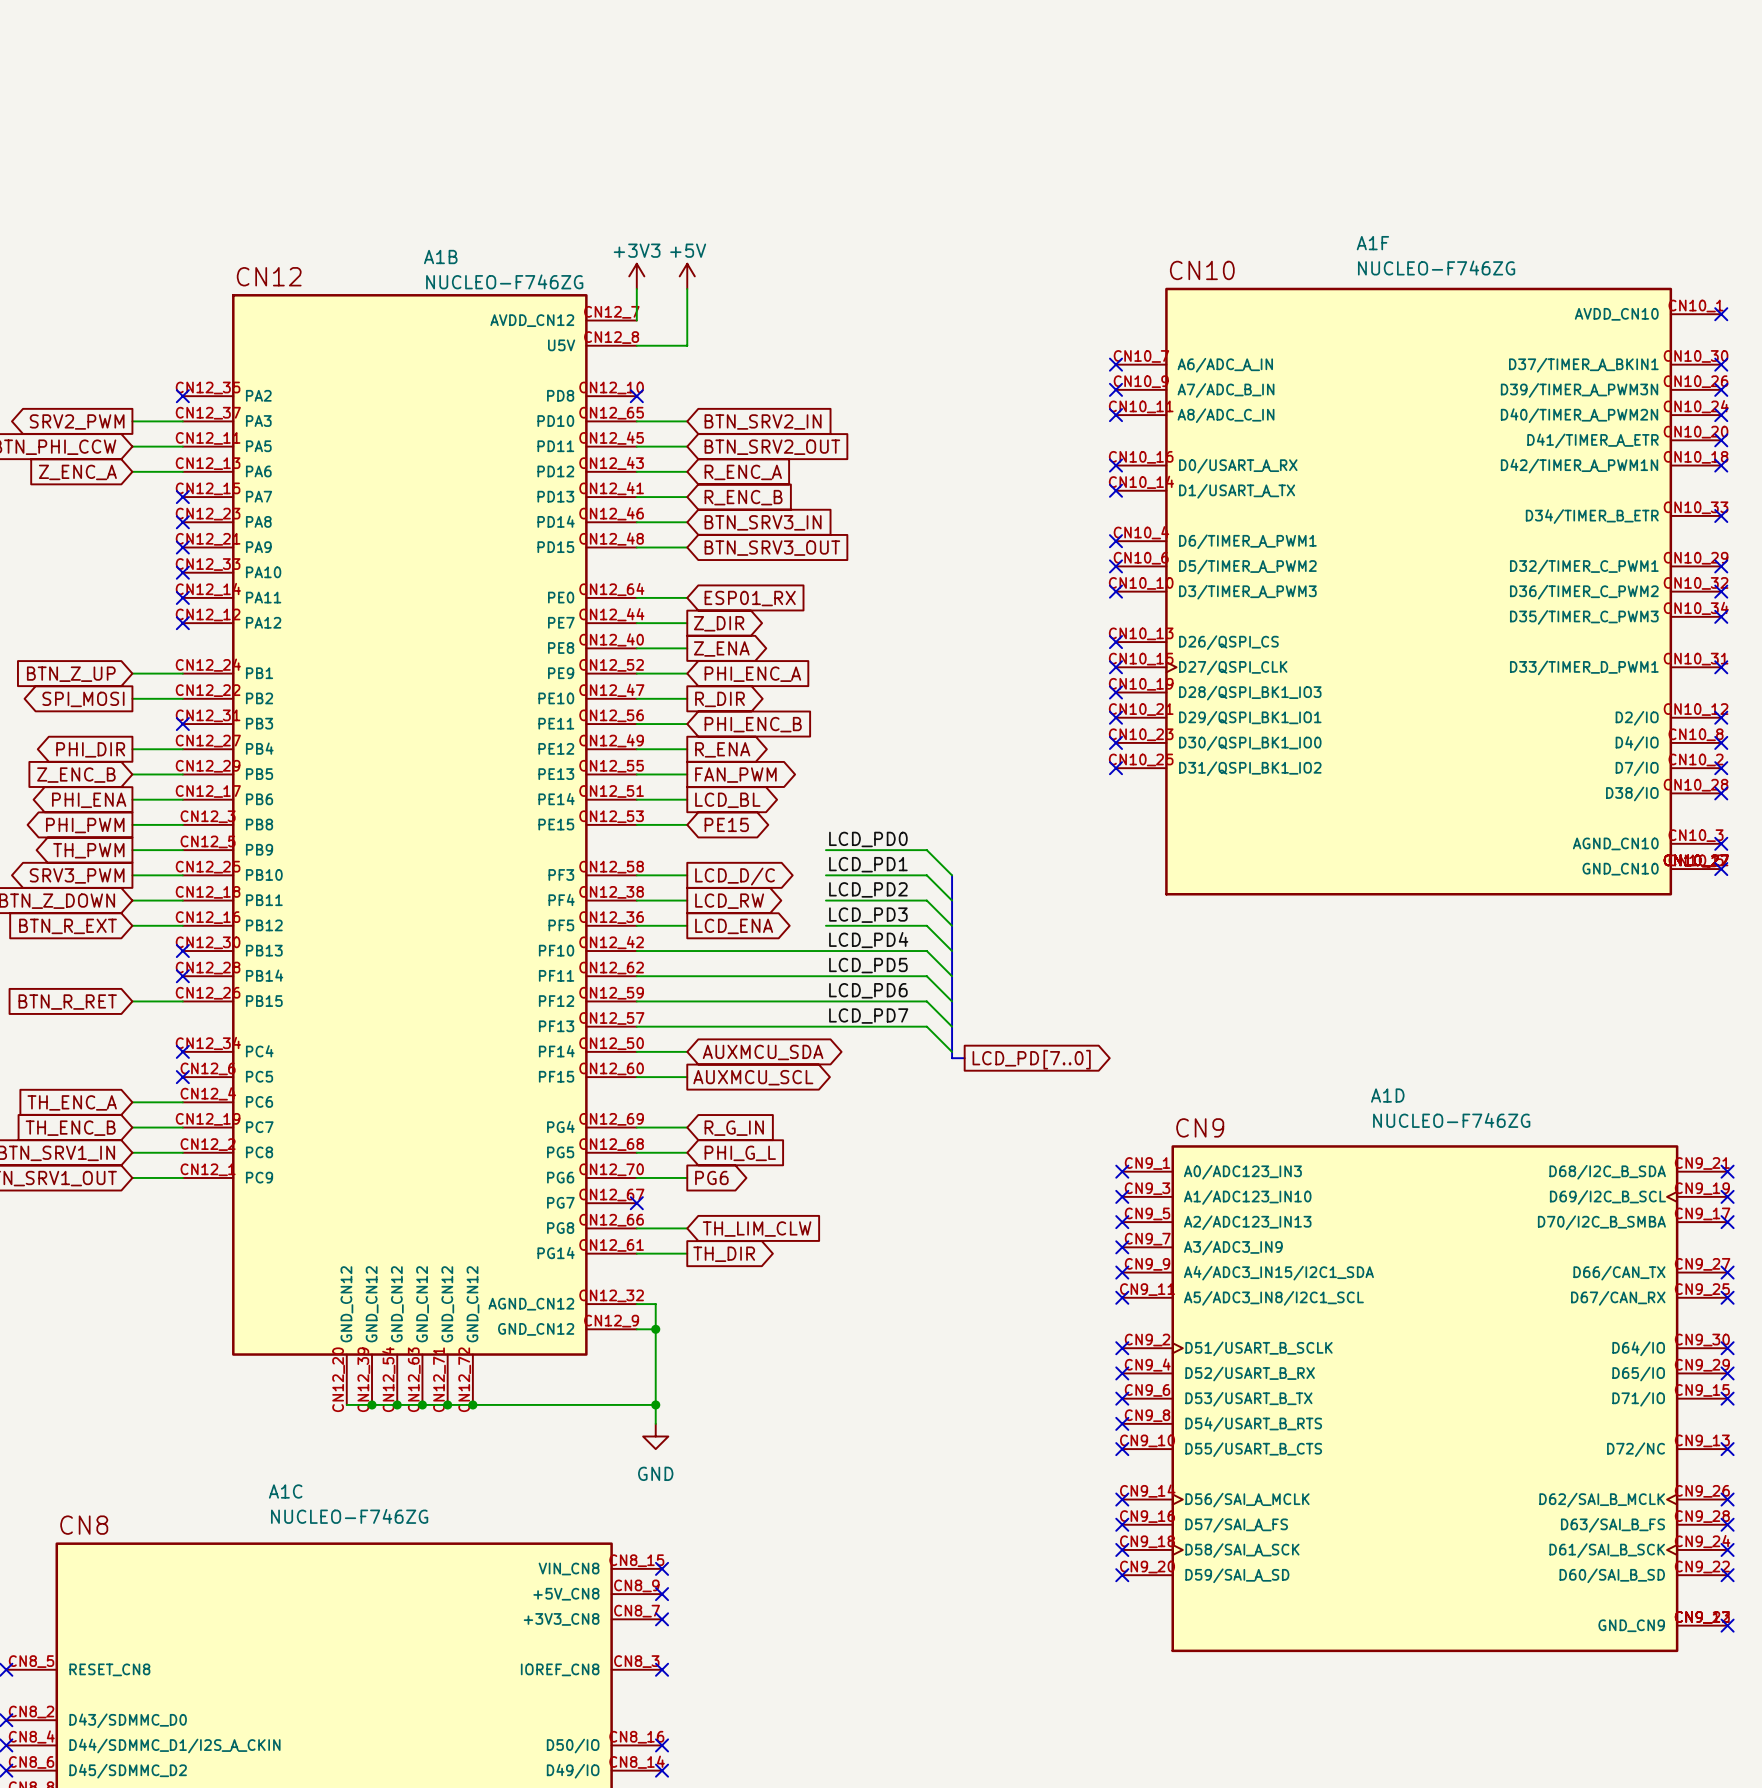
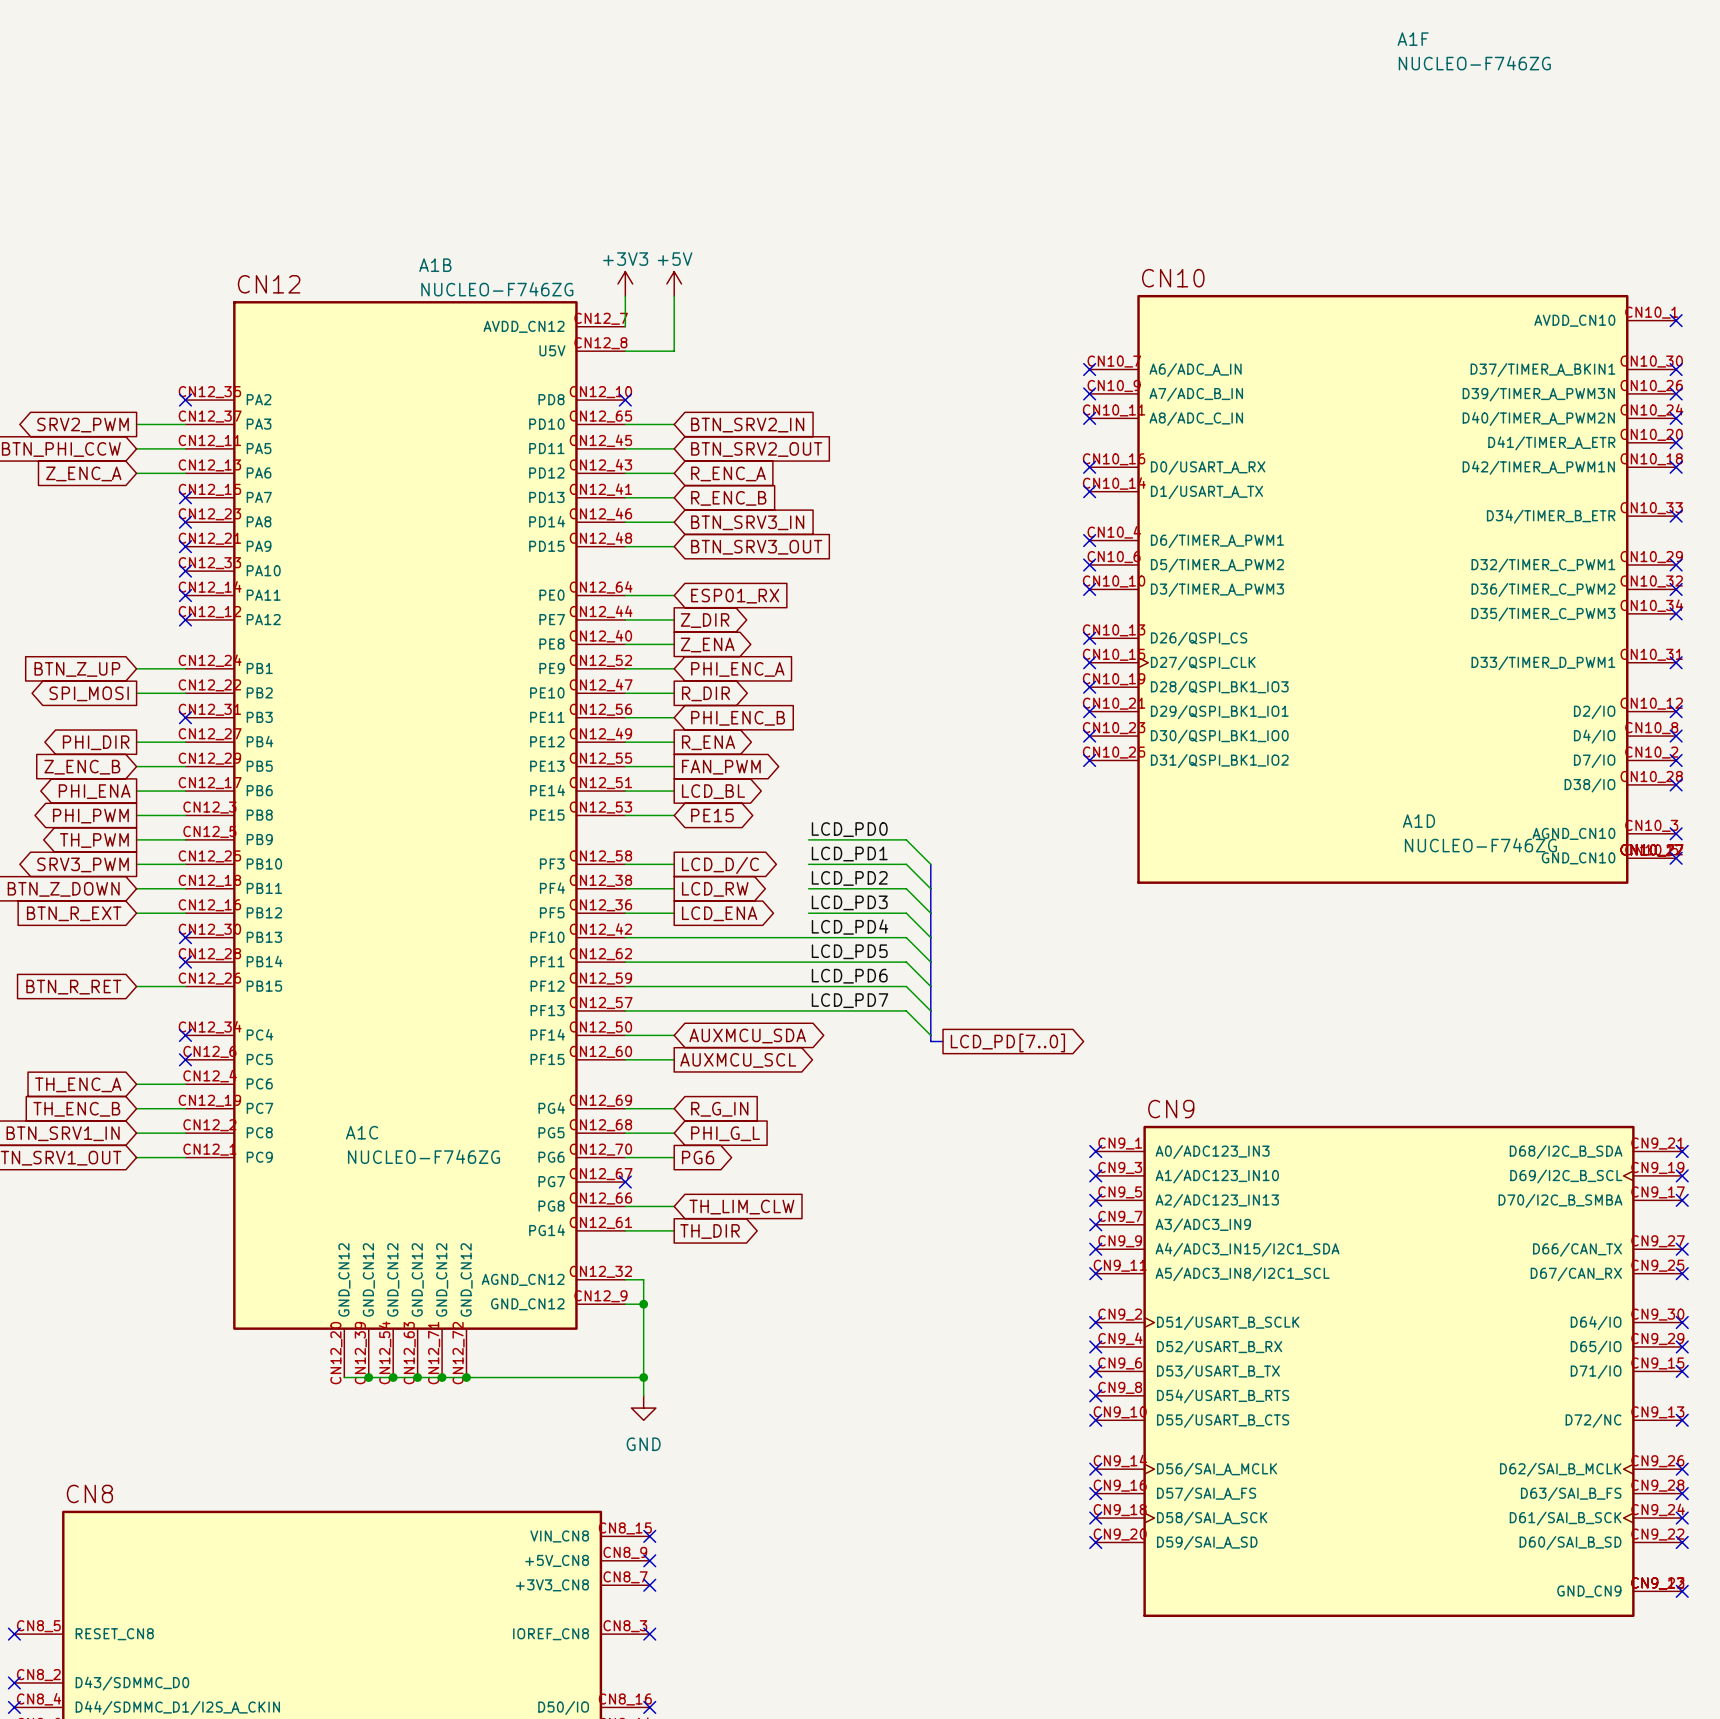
A1F name position: A1F (1372, 243) -> A1F (1413, 39)
A1F value position: NUCLEO-F746ZG (1436, 268) -> NUCLEO-F746ZG (1474, 63)
A1D name position: A1D (1387, 1095) -> A1D (1418, 821)
A1D value position: NUCLEO-F746ZG (1451, 1120) -> NUCLEO-F746ZG (1480, 845)
A1C name position: A1C (285, 1491) -> A1C (362, 1132)
A1C value position: NUCLEO-F746ZG (349, 1516) -> NUCLEO-F746ZG (424, 1156)

